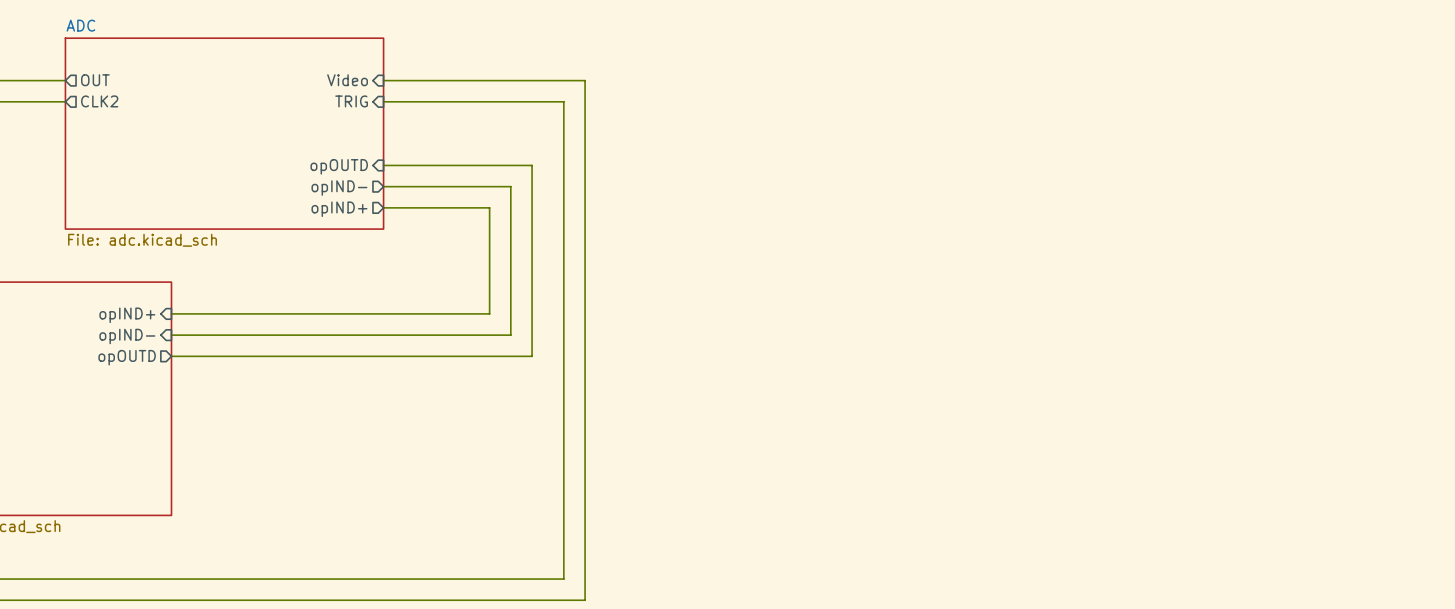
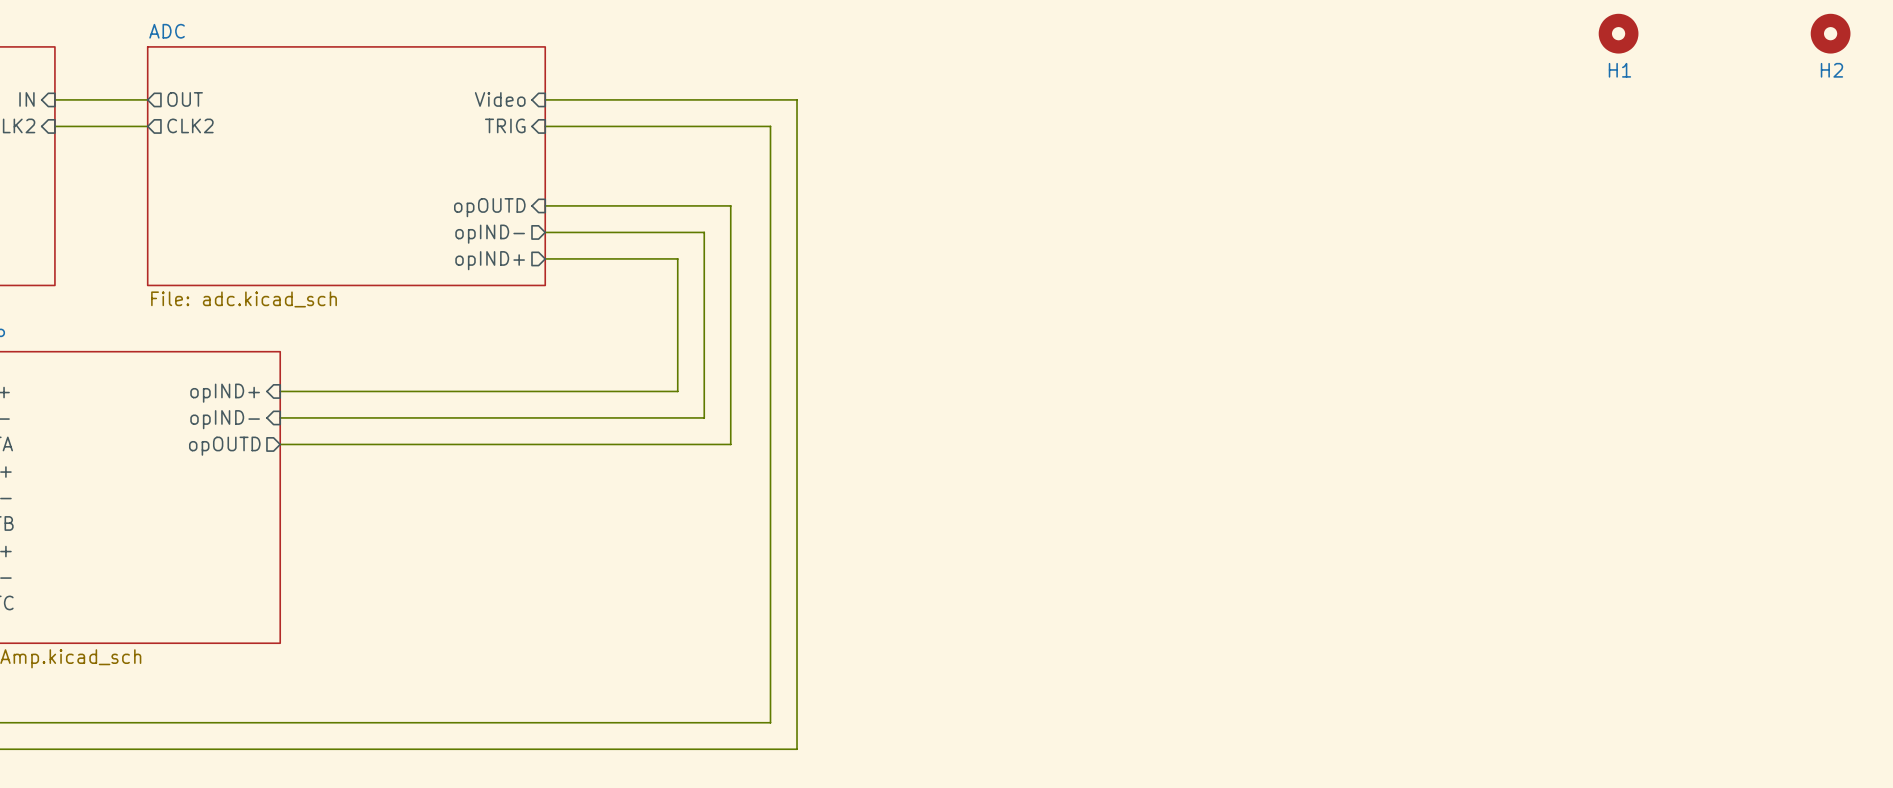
H1: none -> (1618, 33)
H2: none -> (1830, 33)

